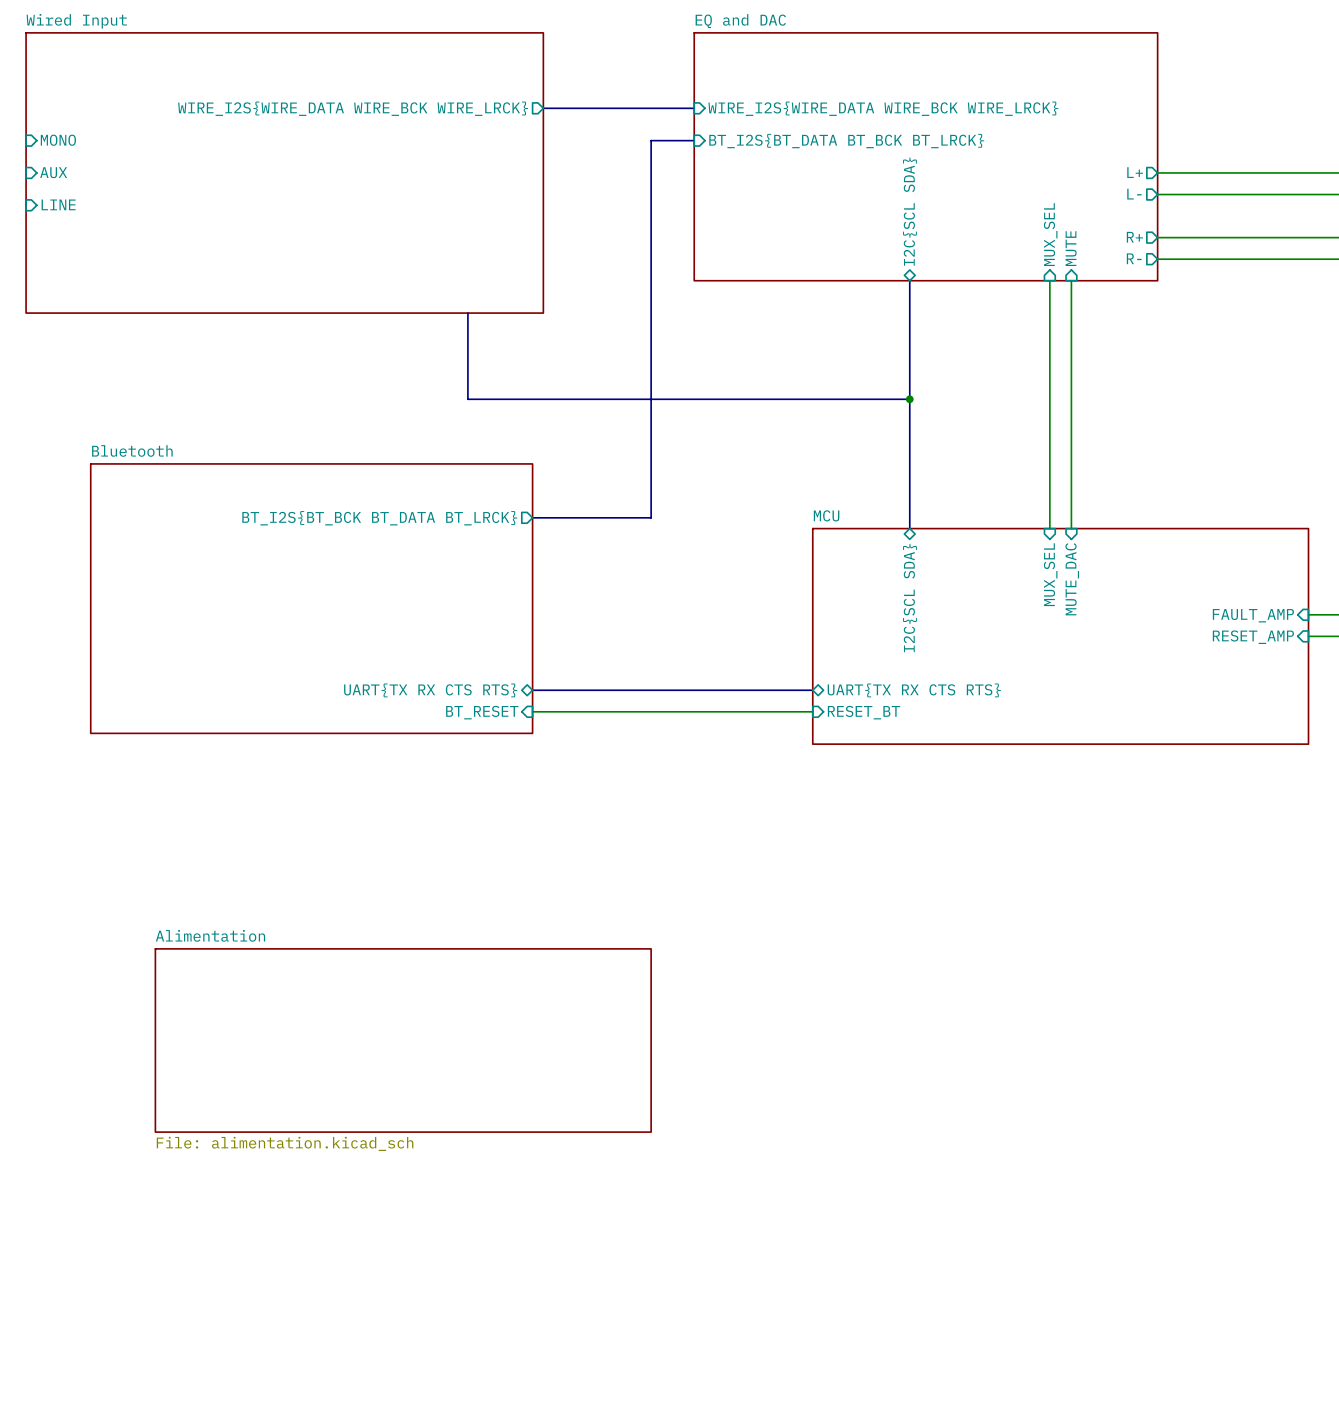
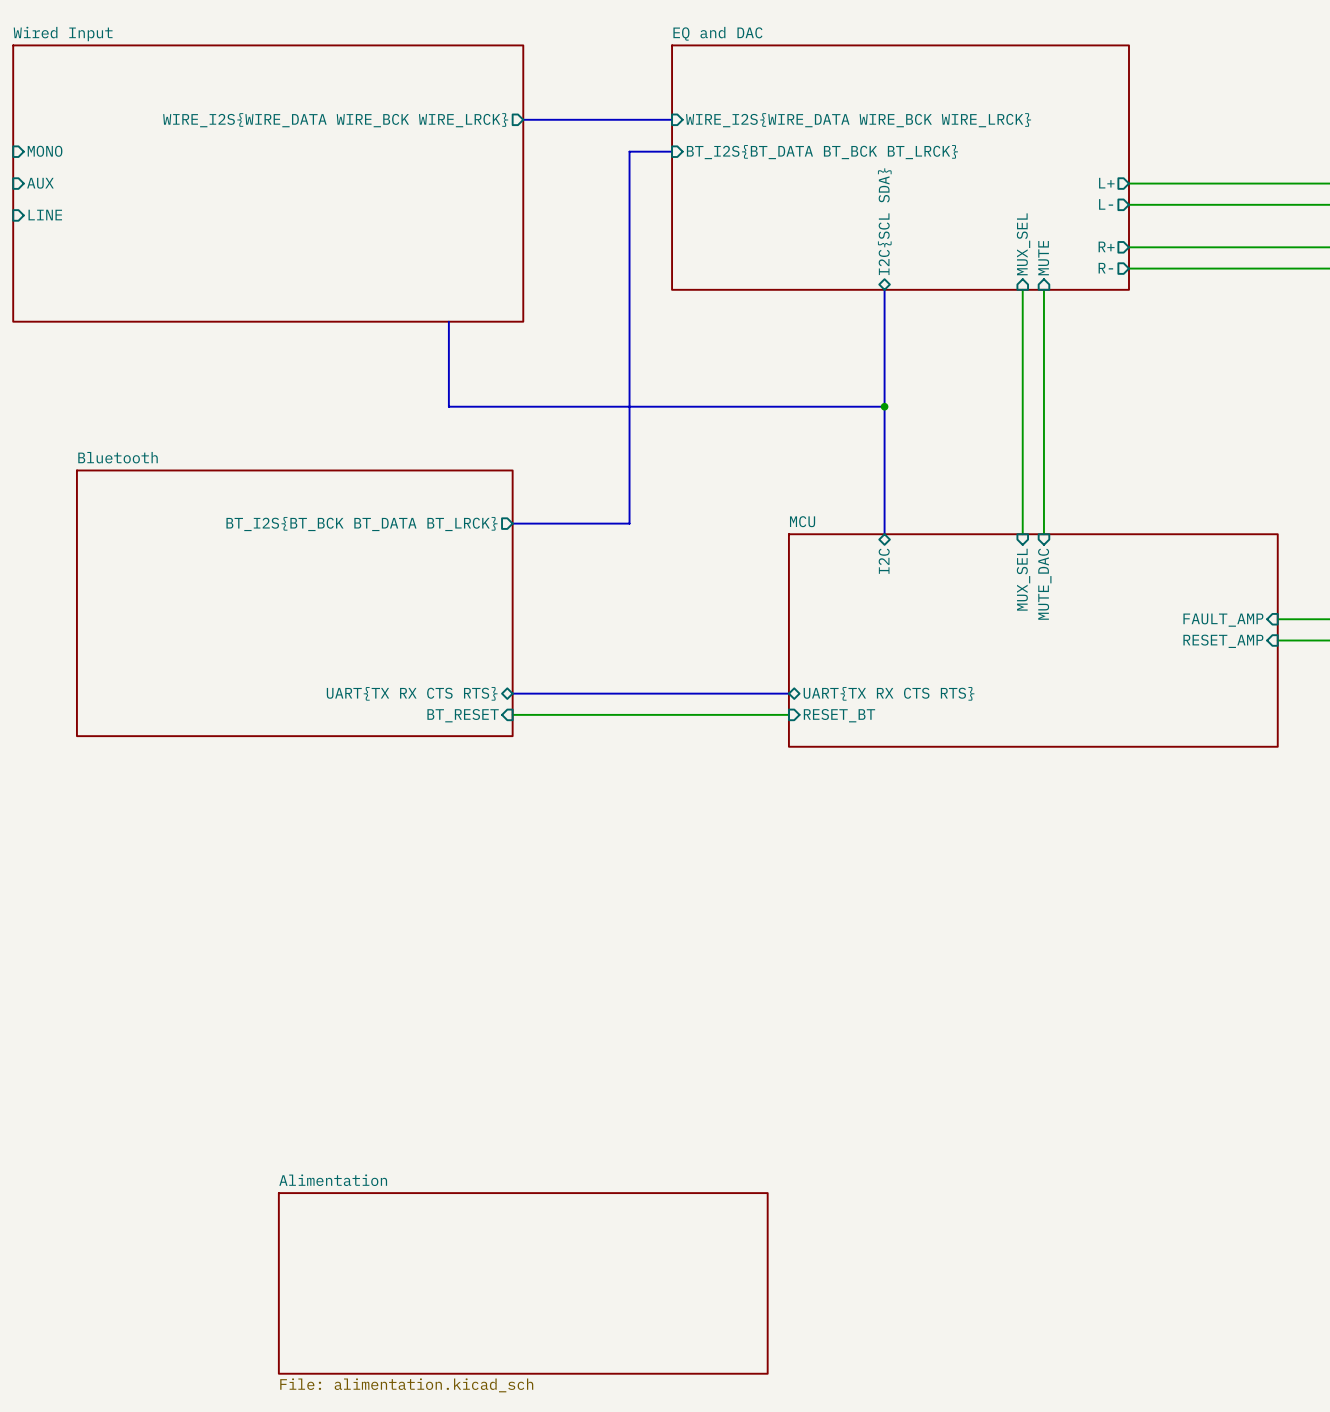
sheet pin: I2C{SCL SDA} (909, 598) -> I2C (884, 561)
sheet Alimentation: File: alimentation.kicad_sch (403, 1040) -> none
sheet Alimentation: none -> File: alimentation.kicad_sch (523, 1283)

